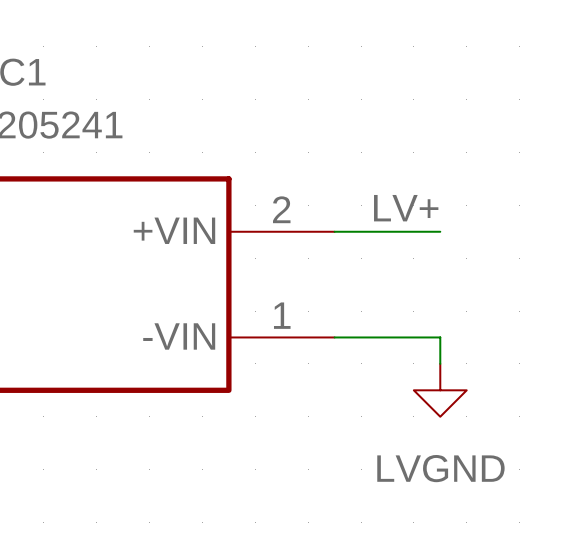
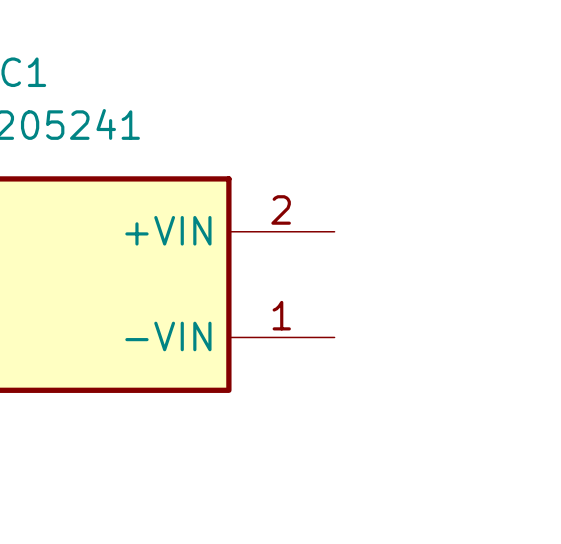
label: LV+ (406, 208) -> none
wire: (334, 231) (440, 231) -> none
wire: (334, 337) (440, 337) (440, 363) -> none
power symbol: LVGND (440, 390) -> none

